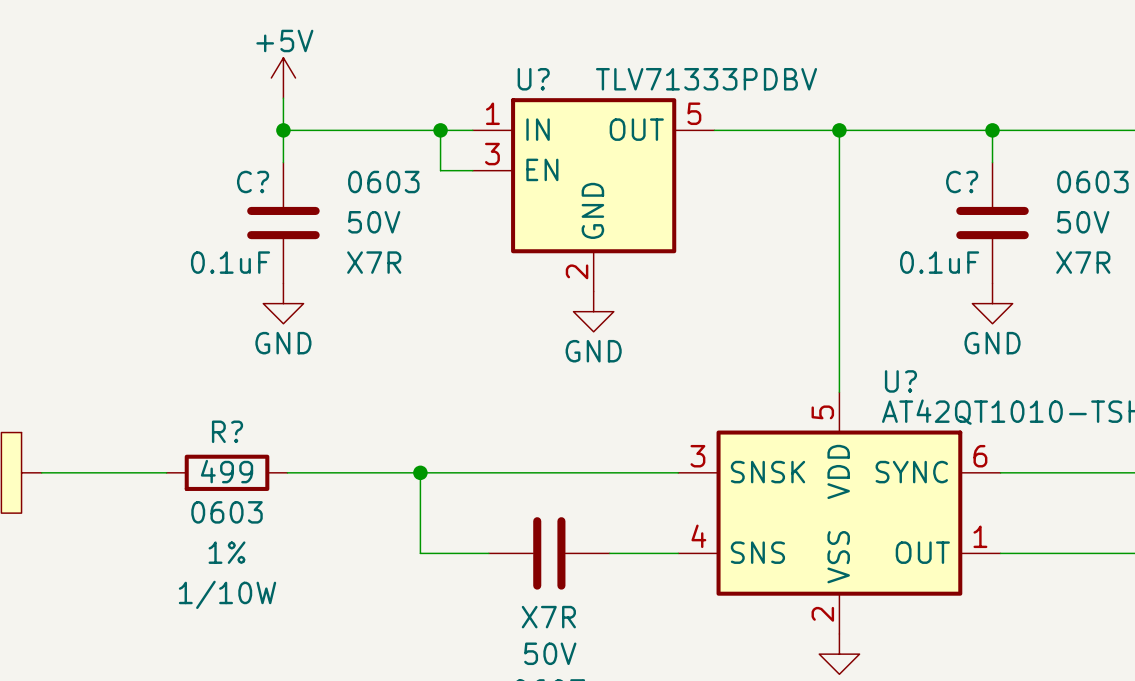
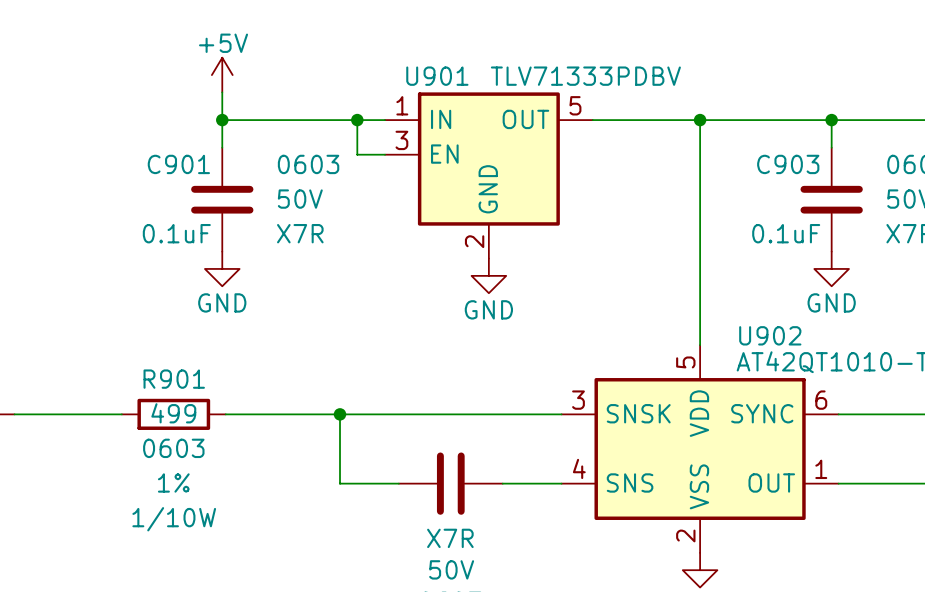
U? name: U? (533, 79) -> U901 (437, 76)
C? name: C? (253, 182) -> C901 (178, 164)
C? name: C? (962, 182) -> C903 (788, 164)
U? name: U? (900, 381) -> U902 (770, 335)
R? name: R? (227, 431) -> R901 (174, 379)

